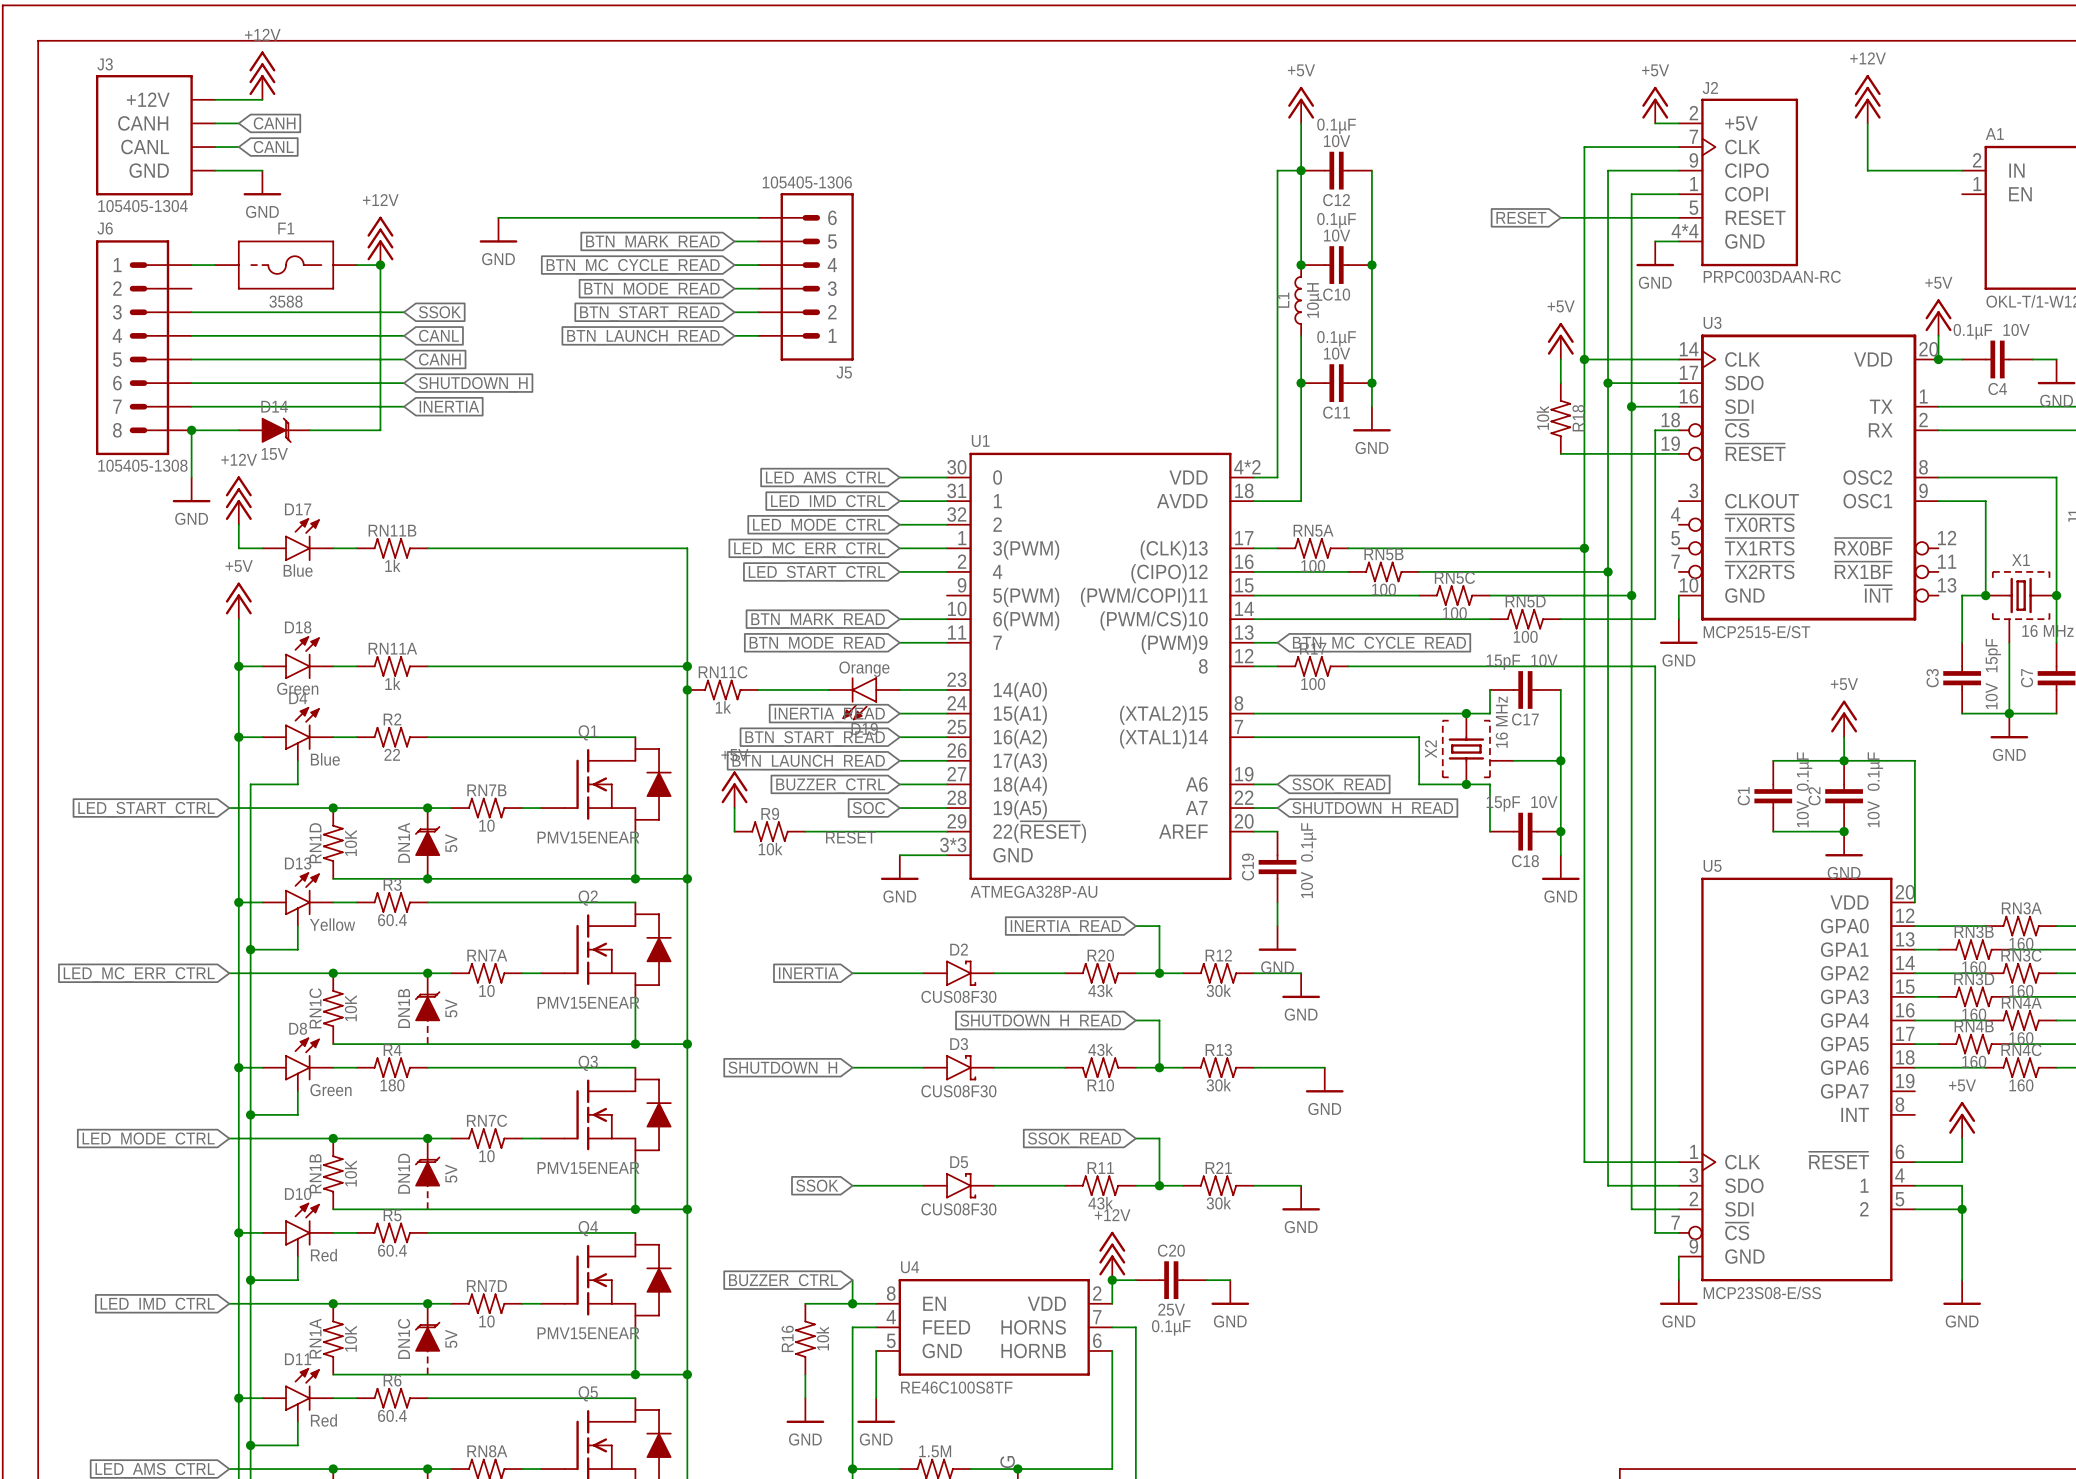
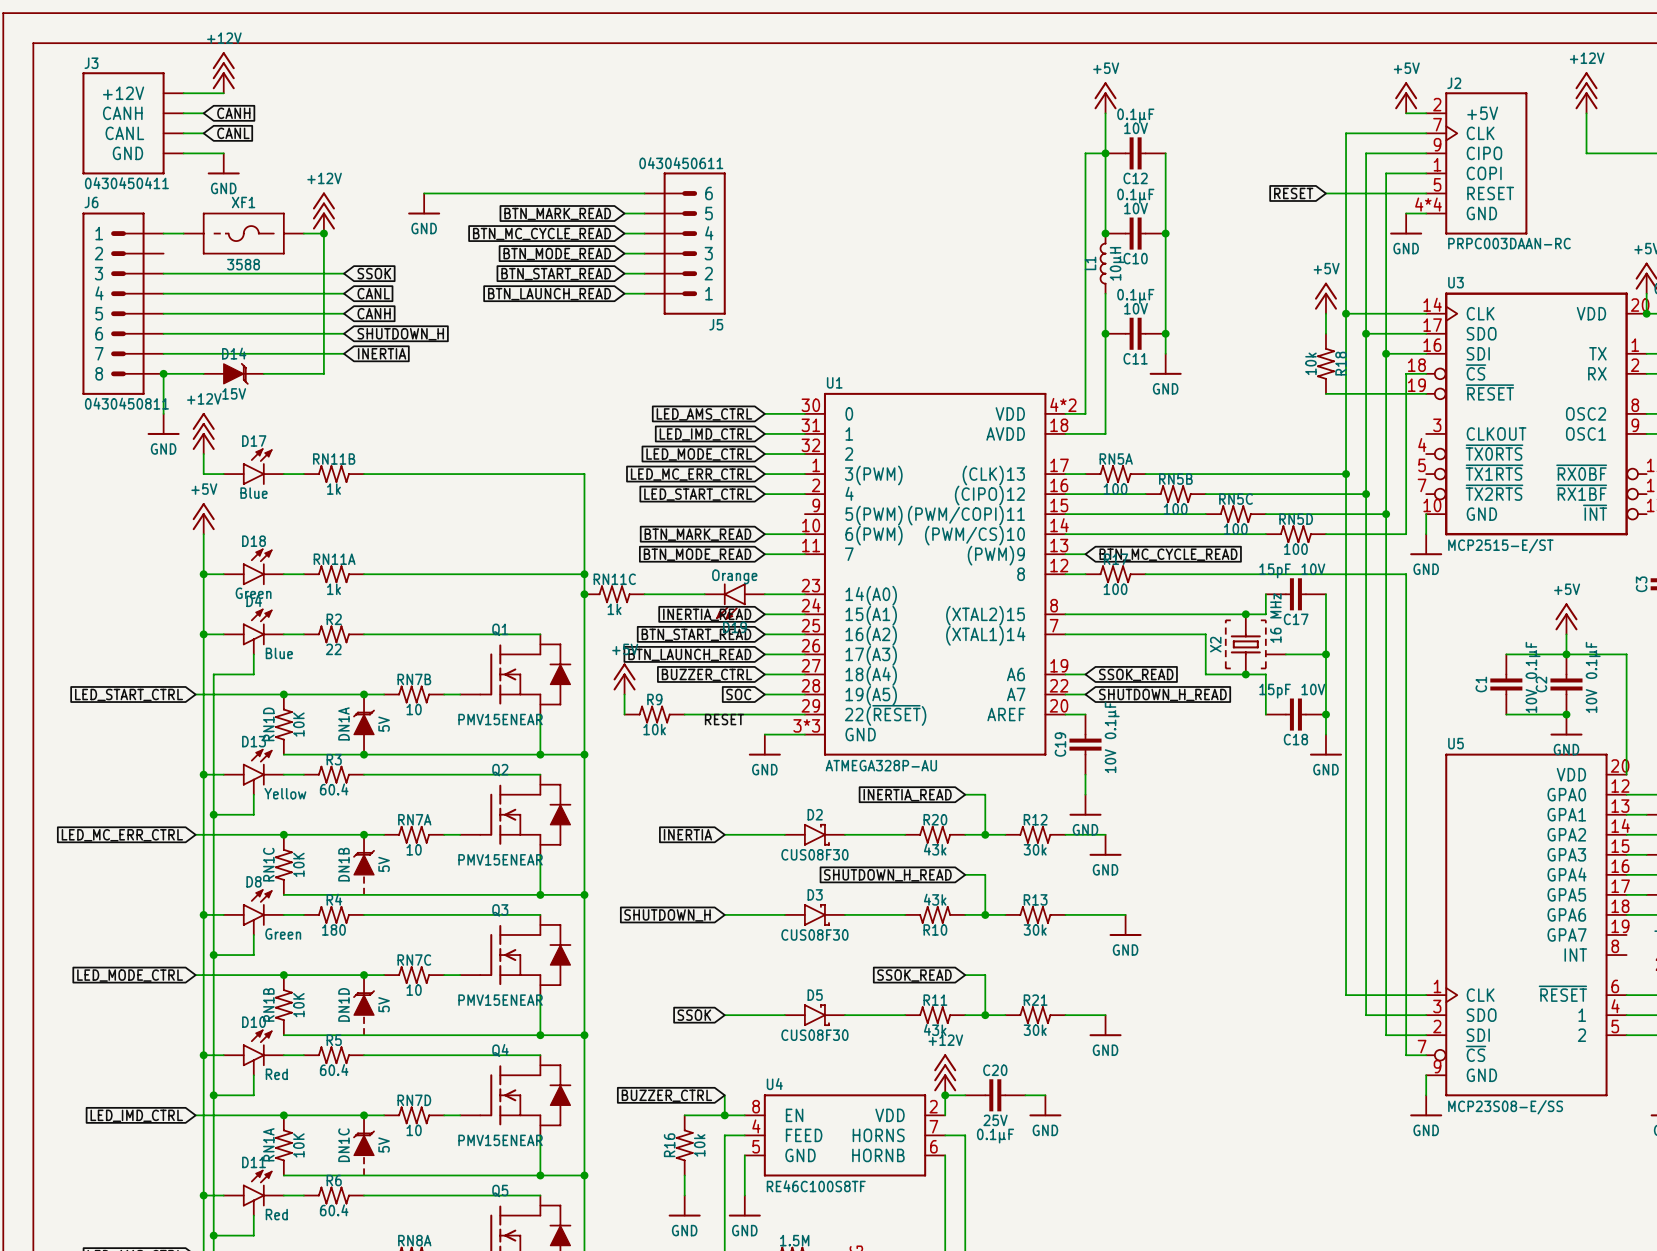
J5 text: 105405-1306 (807, 182) -> 0430450611 (681, 163)
J3 text: 105405-1304 (143, 206) -> 0430450411 (126, 183)
F1 name: F1 (286, 228) -> XF1 (243, 202)
J6 text: 105405-1308 (142, 465) -> 0430450811 (126, 403)

